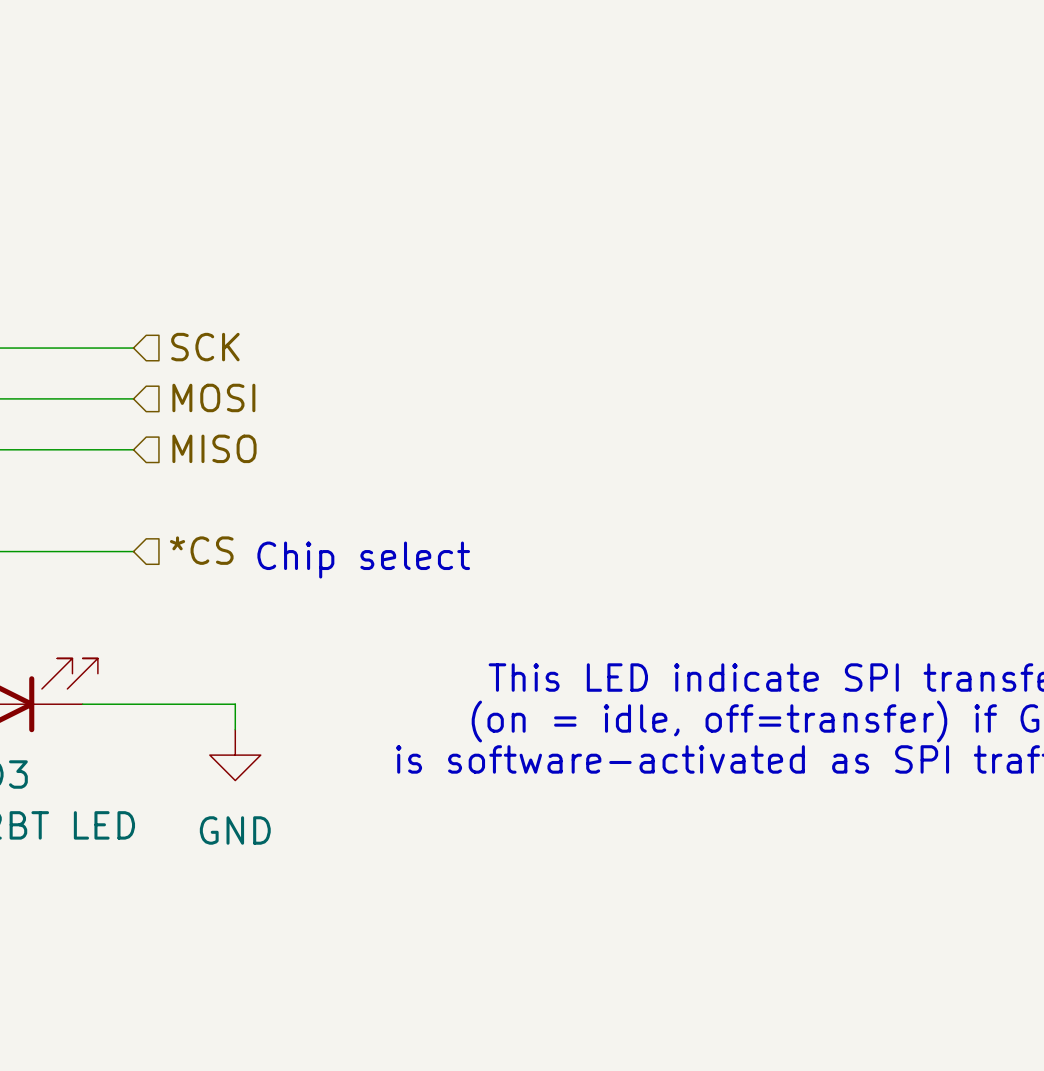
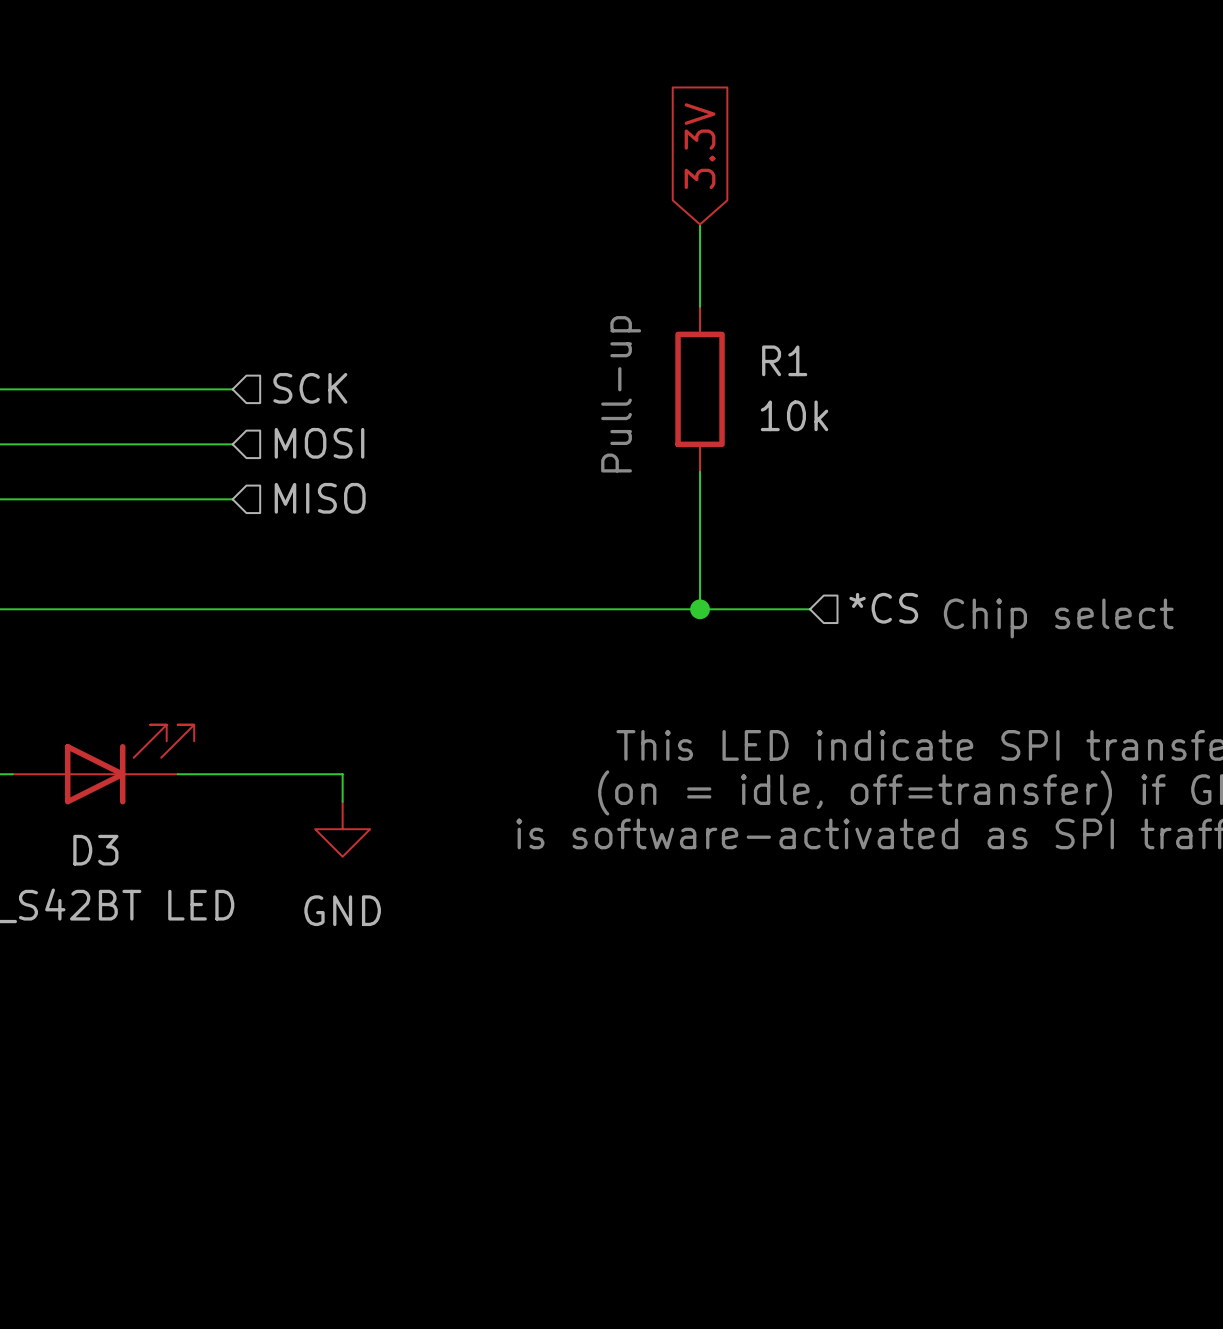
global label: none -> 3.3V (700, 146)
wire: none -> (700, 224) (700, 306)
R1: none -> 10k (700, 389)
text: none -> Pull-up (621, 394)
wire: none -> (700, 471) (700, 609)
hierarchical label: *CS (201, 550) -> none
hierarchical label: none -> *CS (883, 608)
wire: none -> (232, 609) (810, 609)
junction: none -> (700, 609)
text: Chip select (363, 560) -> none
text: none -> Chip select (1058, 618)

